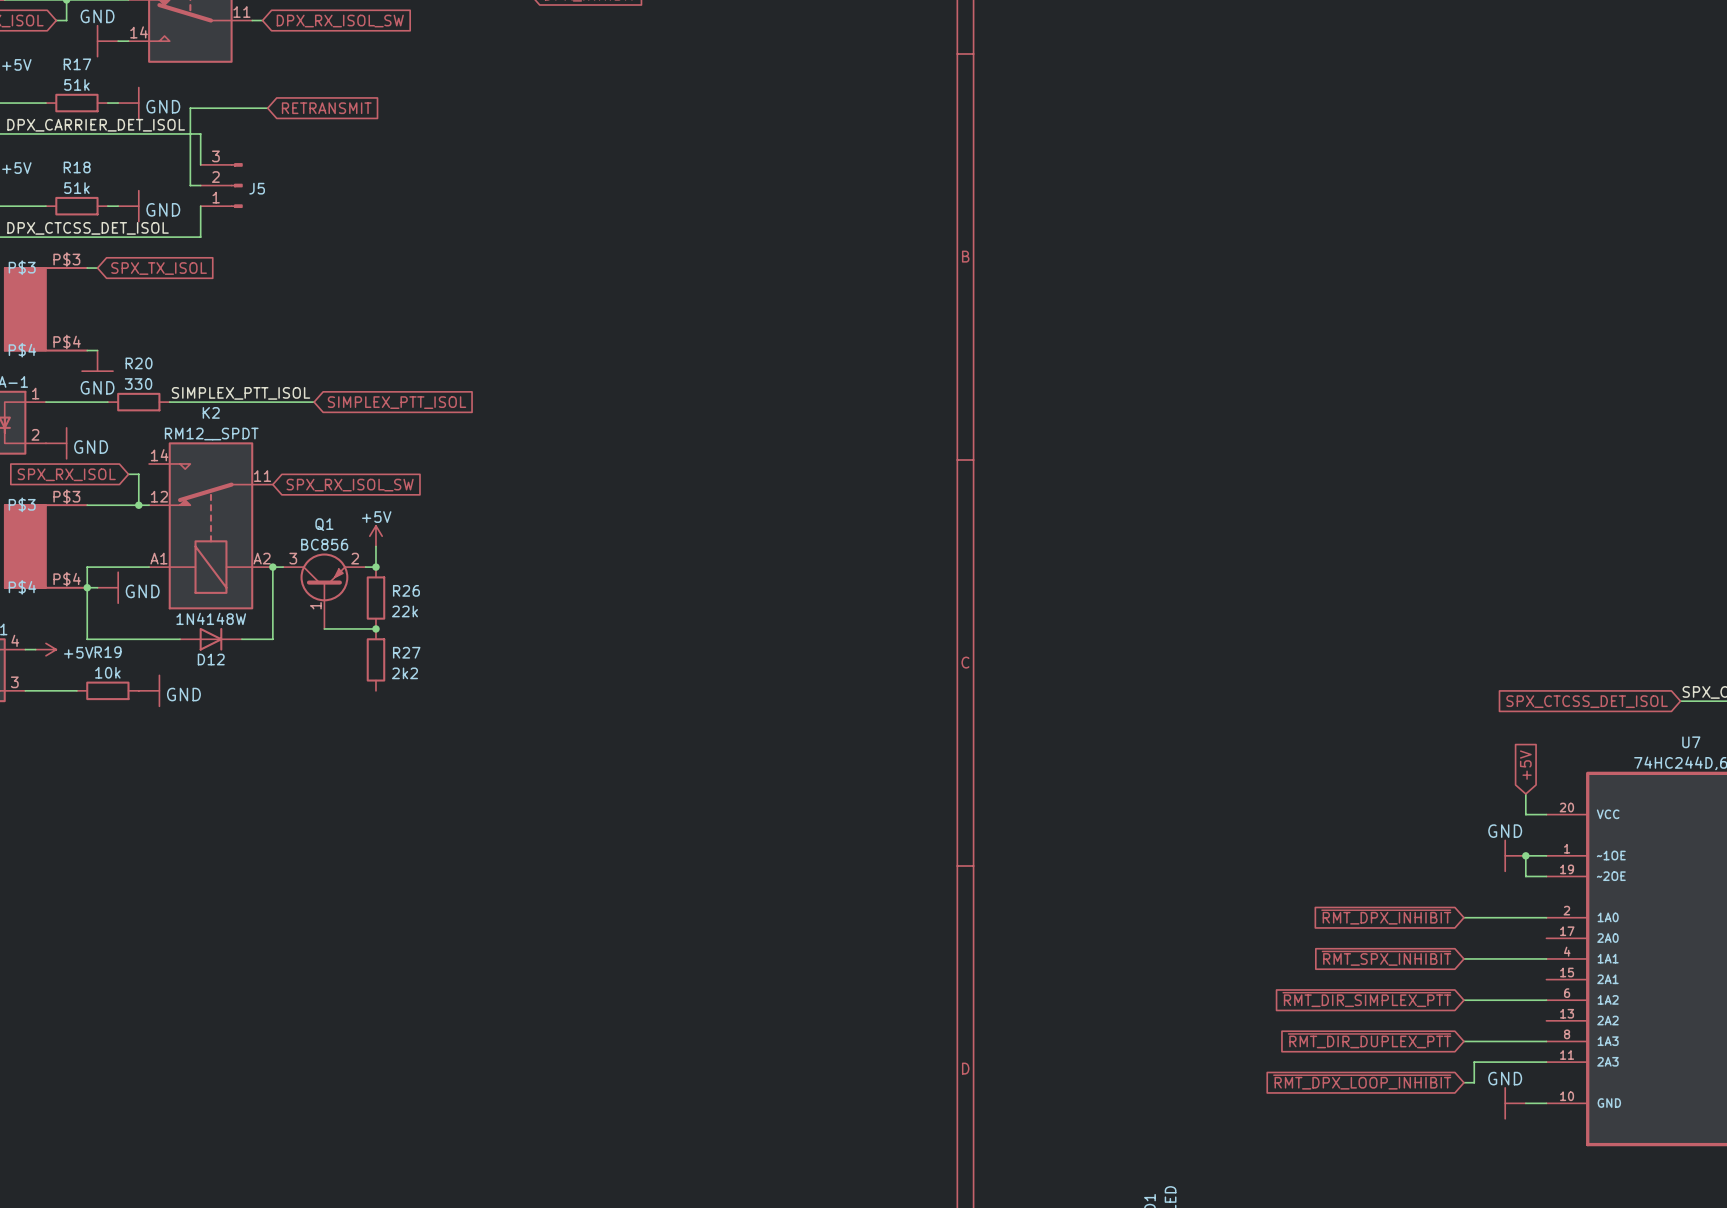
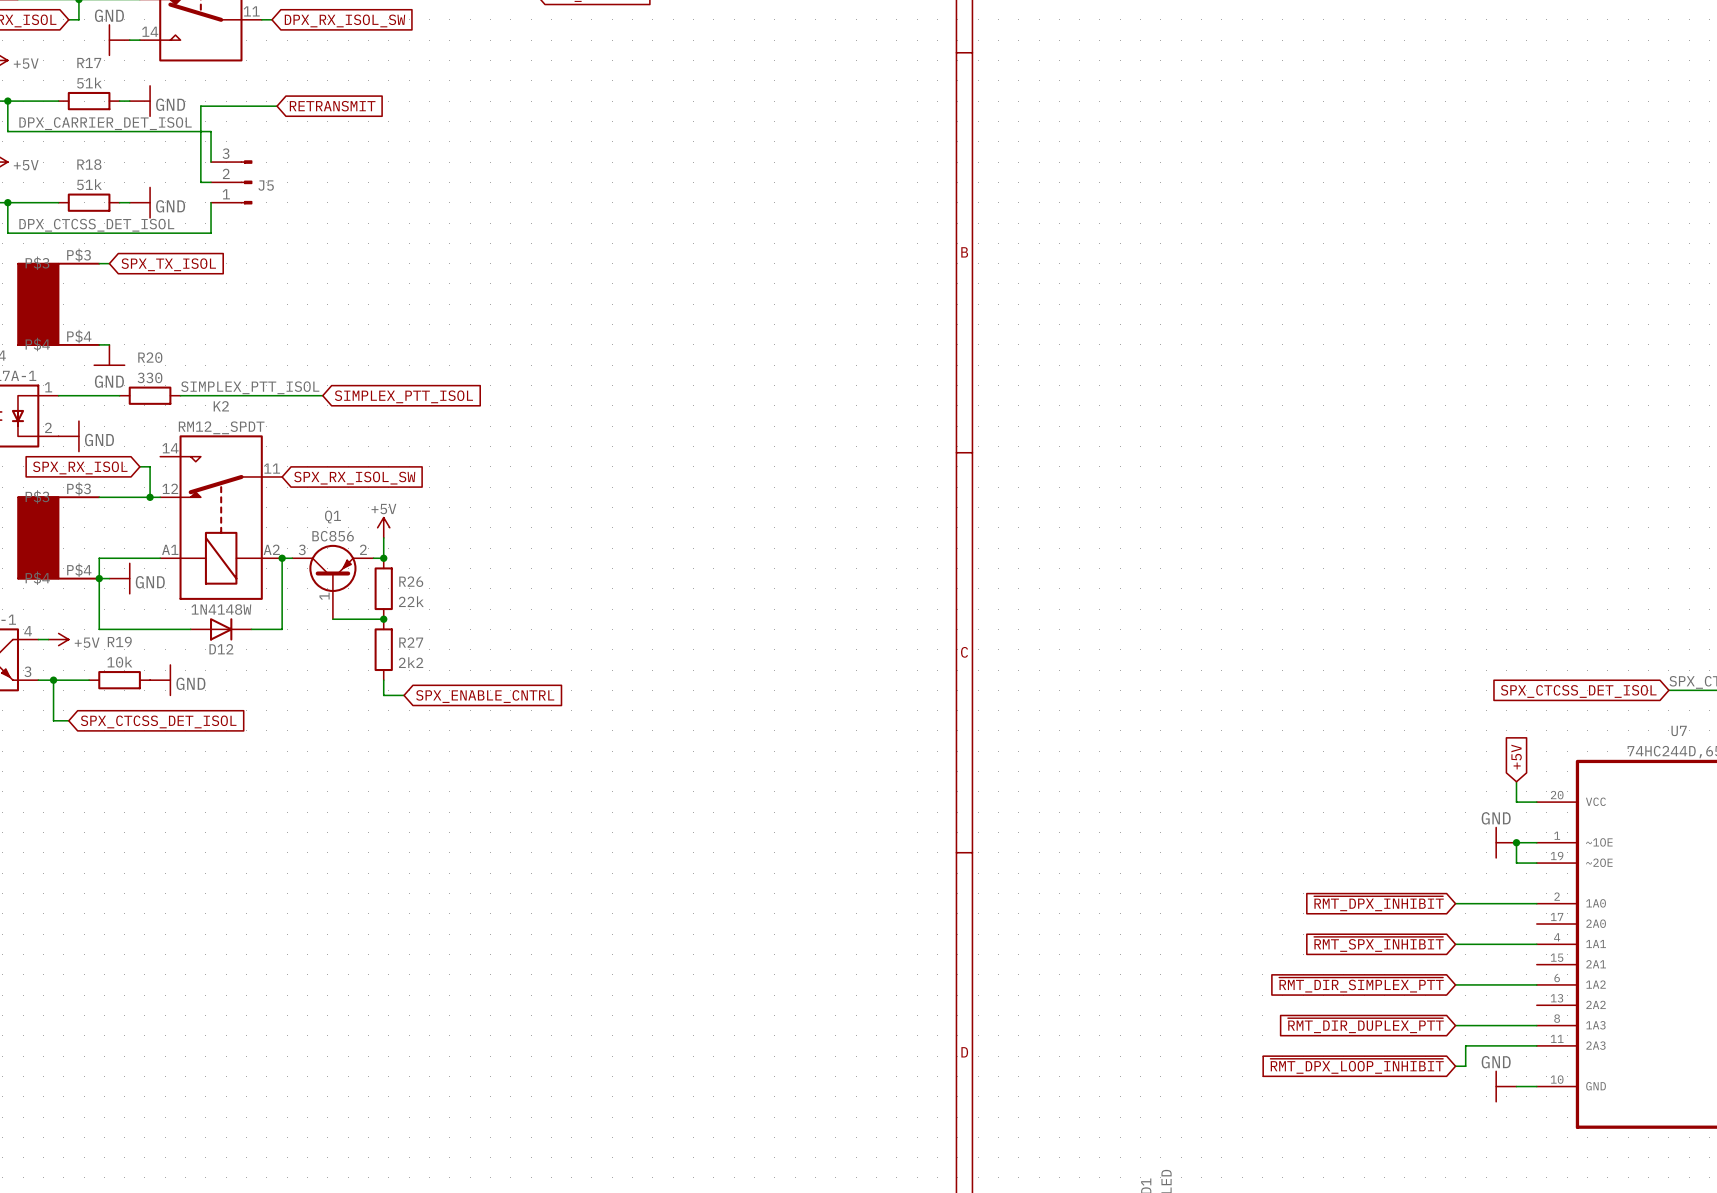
wire: none -> (53, 680) (53, 720) (68, 720)
junction: none -> (53, 680)
wire: none -> (383, 680) (383, 695) (404, 695)
global label: none -> SPX_ENABLE_CNTRL (485, 696)
global label: none -> SPX_CTCSS_DET_ISOL (158, 721)

